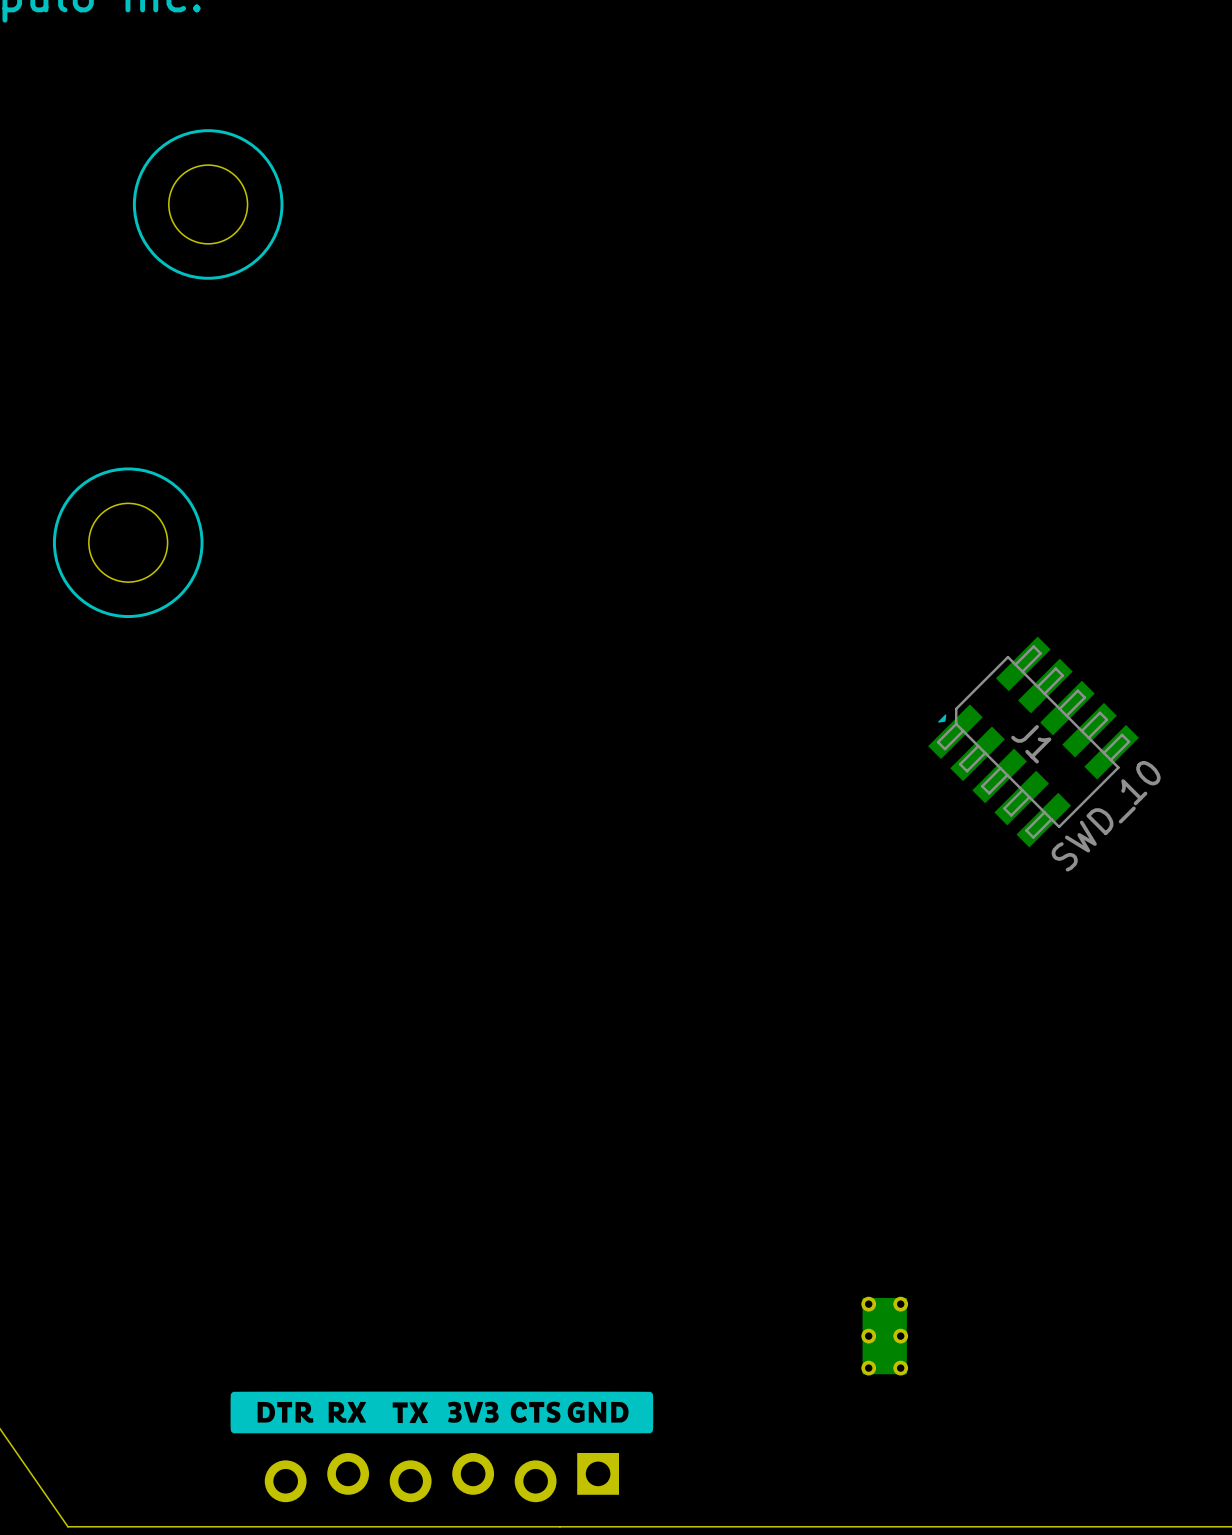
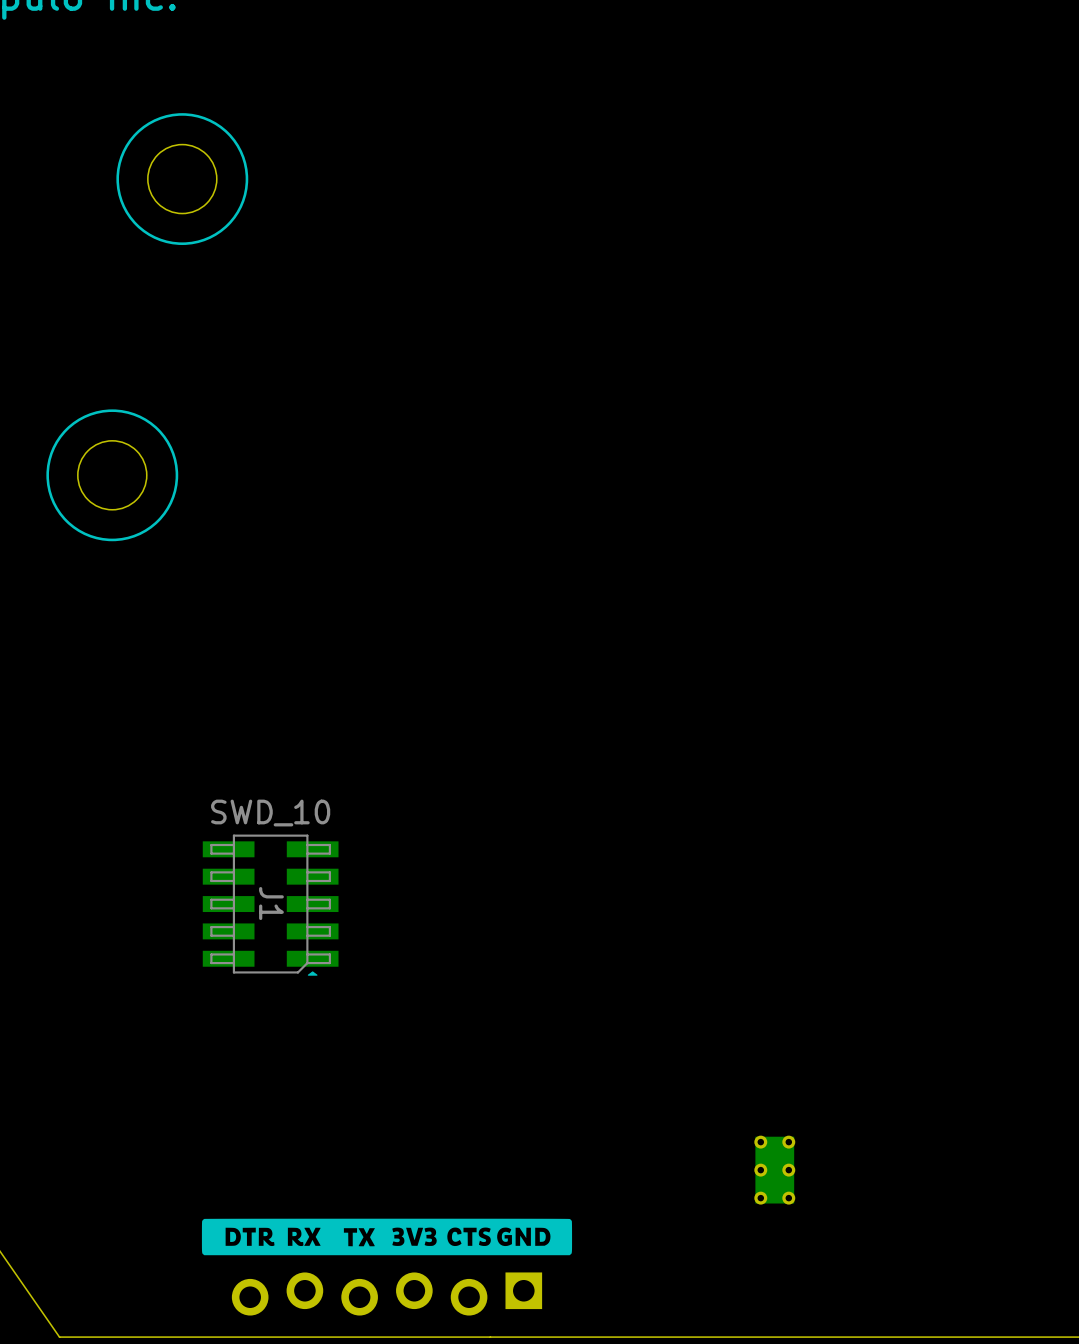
J1 rotation: 0° (1033, 742) -> 135° counterclockwise (270, 905)
J1 position: (1033, 742) -> (270, 905)

